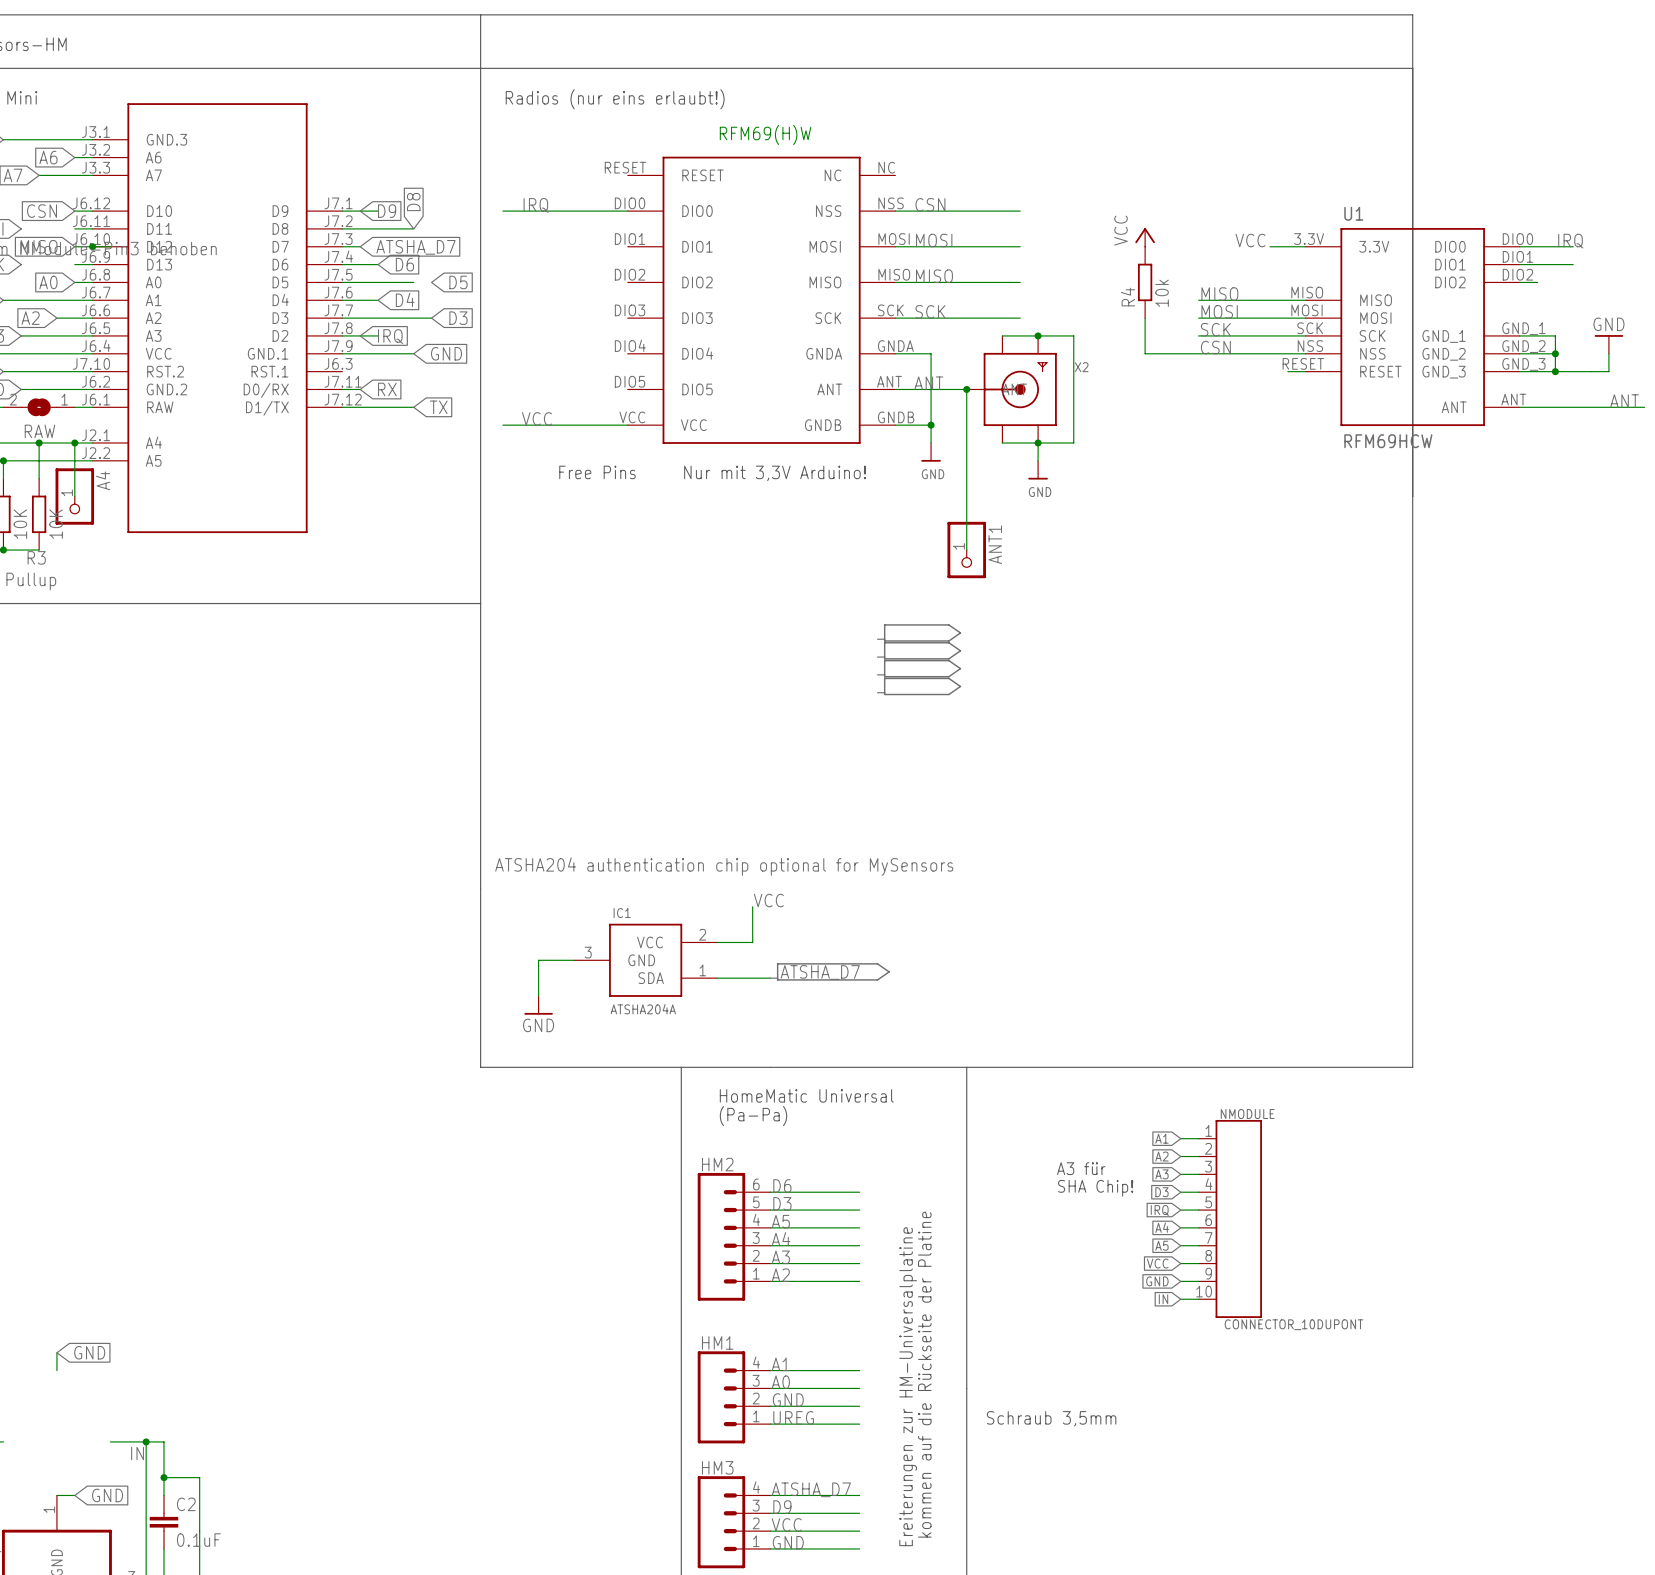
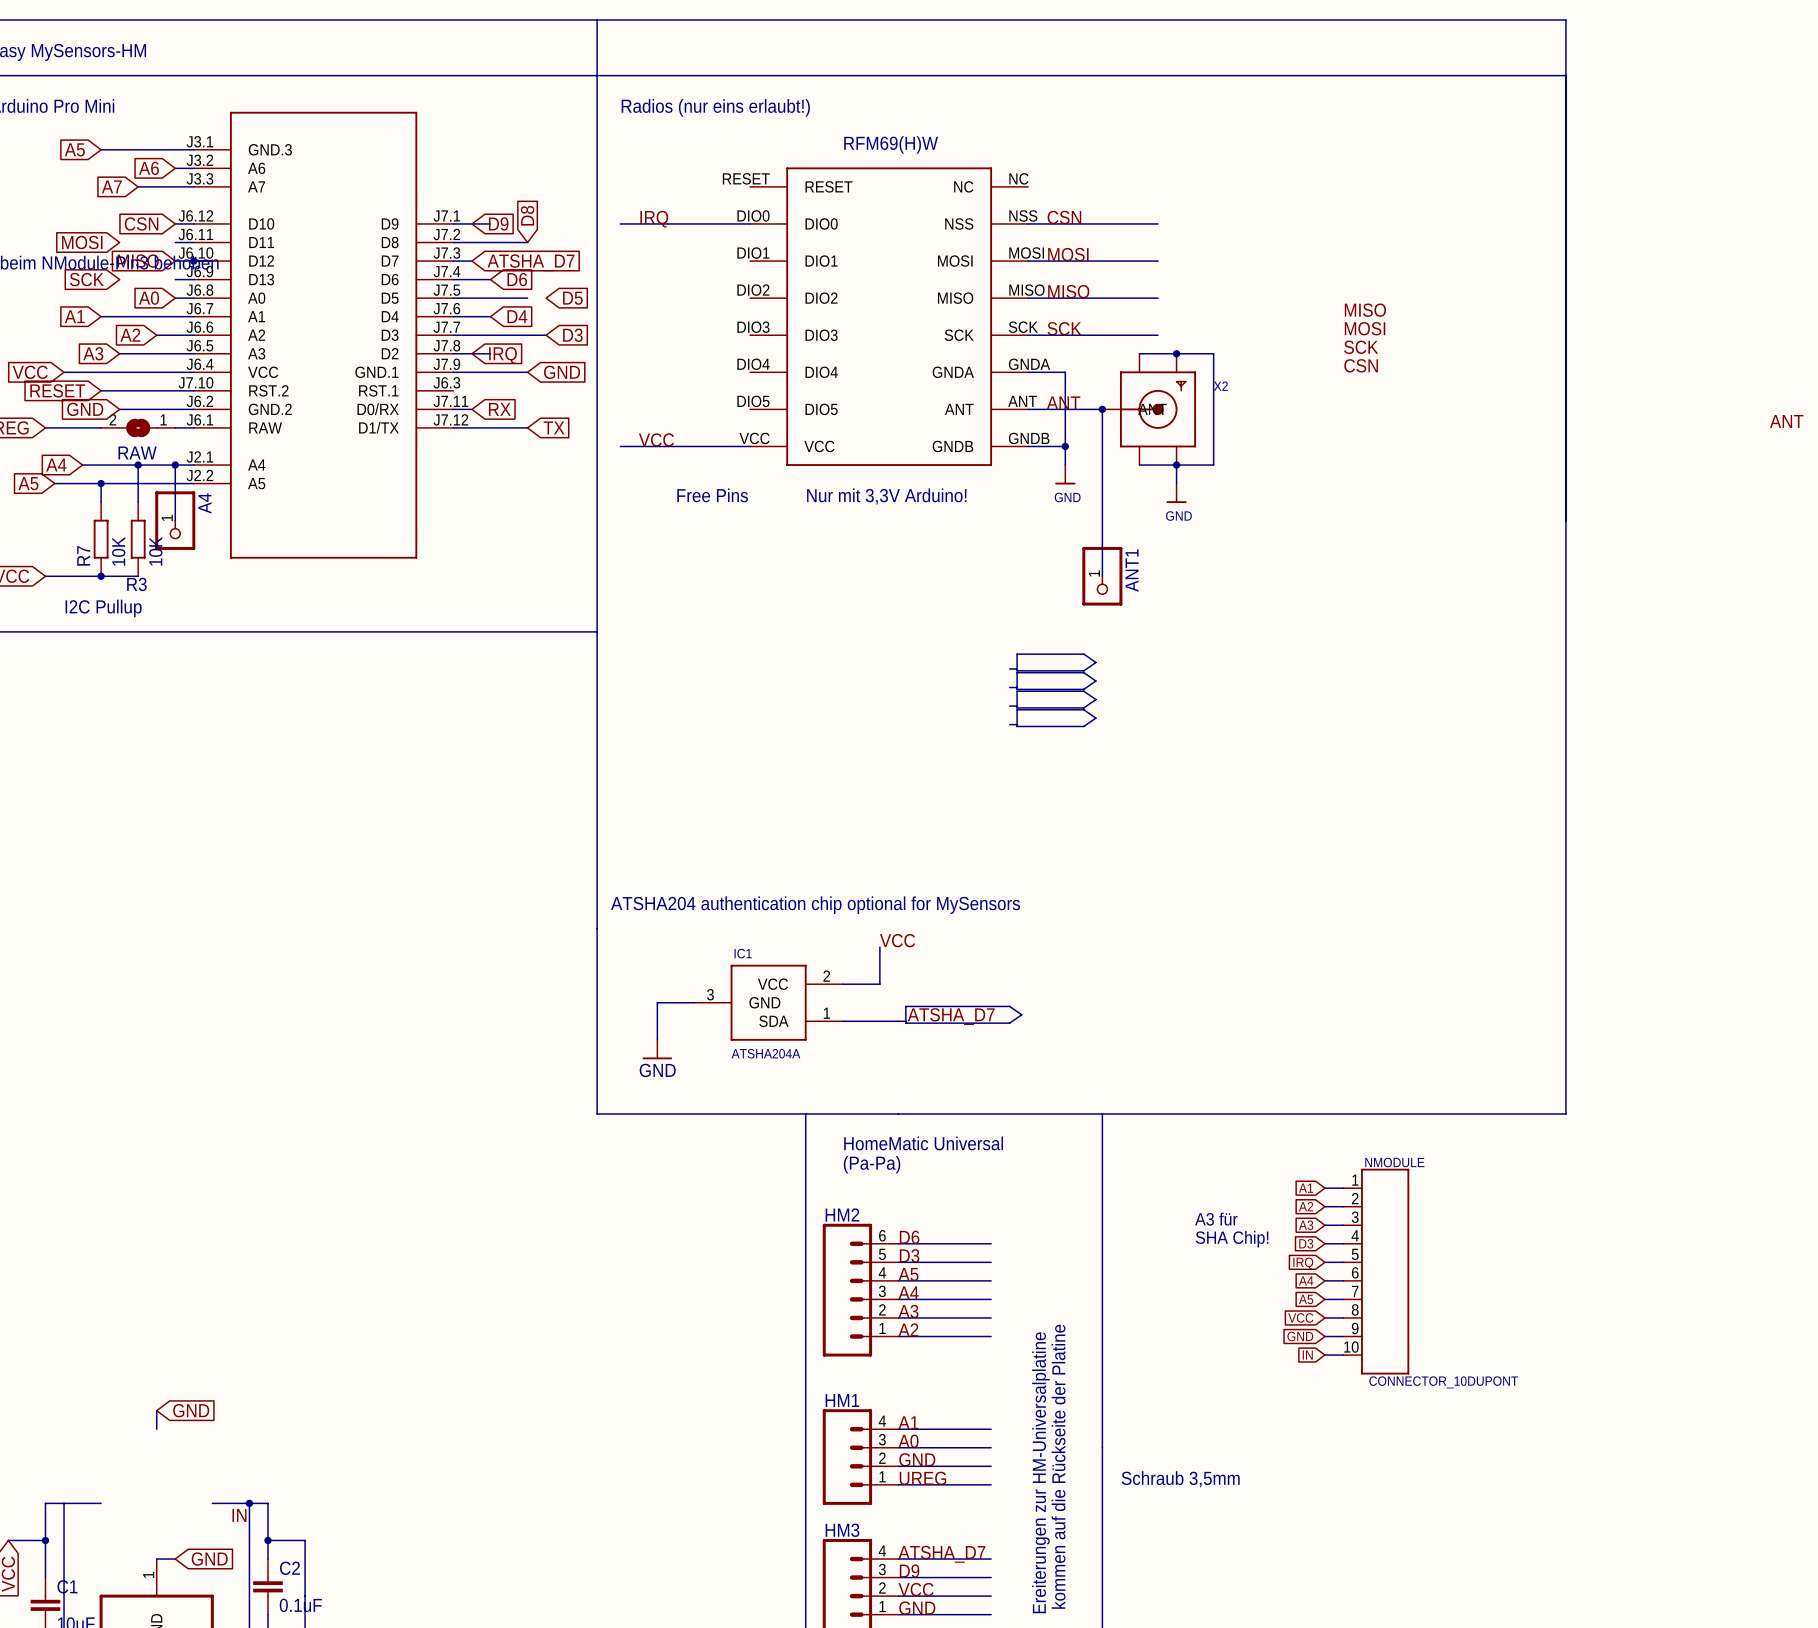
power symbol: VCC (1145, 237) -> none
label: VCC (1250, 240) -> none
label: IRQ (1570, 241) -> none
wire: (1269, 246) (1305, 246) -> none
wire: (1519, 246) (1573, 246) -> none
wire: (1519, 264) (1573, 264) -> none
R4: 10k (1145, 282) -> none
wire: (1519, 282) (1537, 282) -> none
wire: (1198, 300) (1305, 300) -> none
wire: (1145, 318) (1145, 353) (1305, 353) -> none
wire: (1198, 318) (1305, 318) -> none
U1: RFM69HCW (1412, 327) -> none
wire: (1198, 335) (1305, 335) -> none
wire: (1519, 335) (1555, 335) (1555, 371) -> none
power symbol: GND (1608, 344) -> none
wire: (1519, 353) (1555, 353) -> none
junction: (1555, 353) -> none
wire: (1608, 353) (1608, 371) (1519, 371) -> none
wire: (1287, 371) (1305, 371) -> none
junction: (1555, 371) -> none
wire: (1519, 407) (1644, 407) -> none

